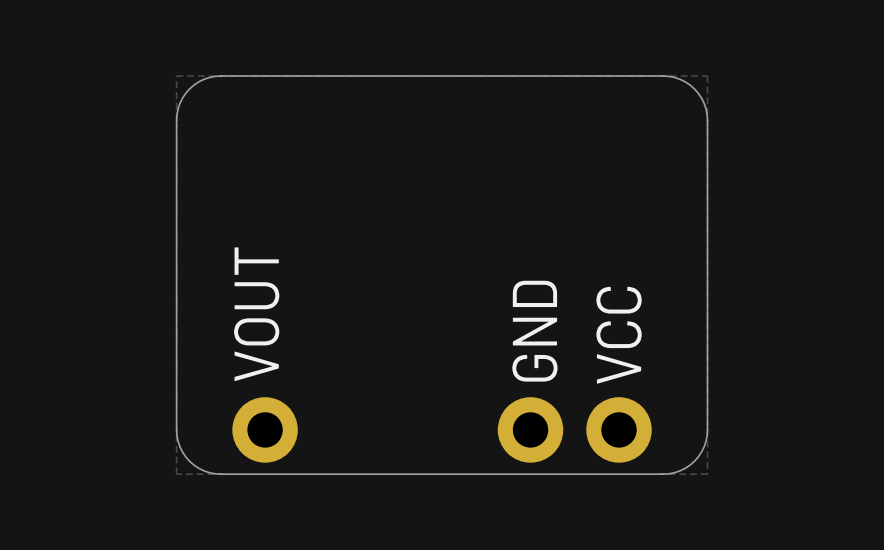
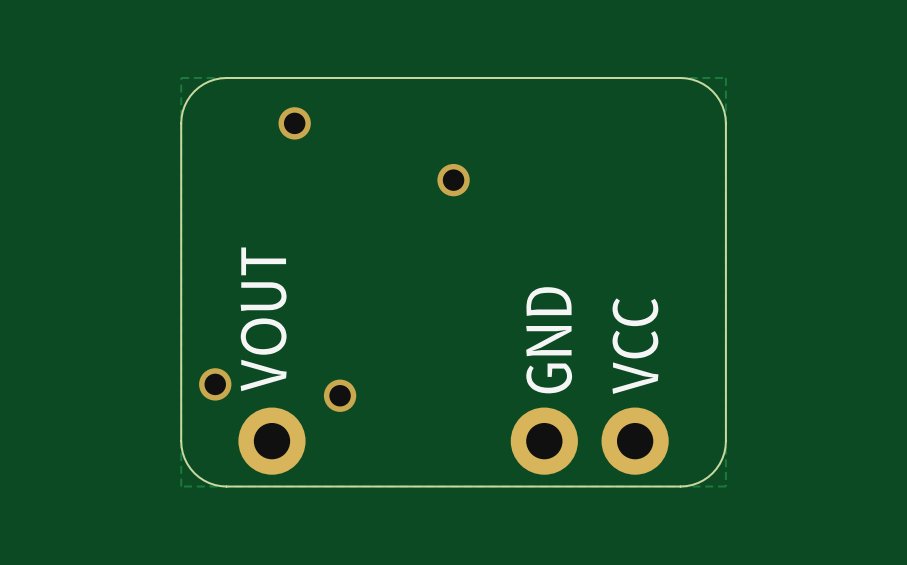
via: none -> (294, 123)
via: none -> (453, 180)
via: none -> (215, 384)
via: none -> (340, 395)

